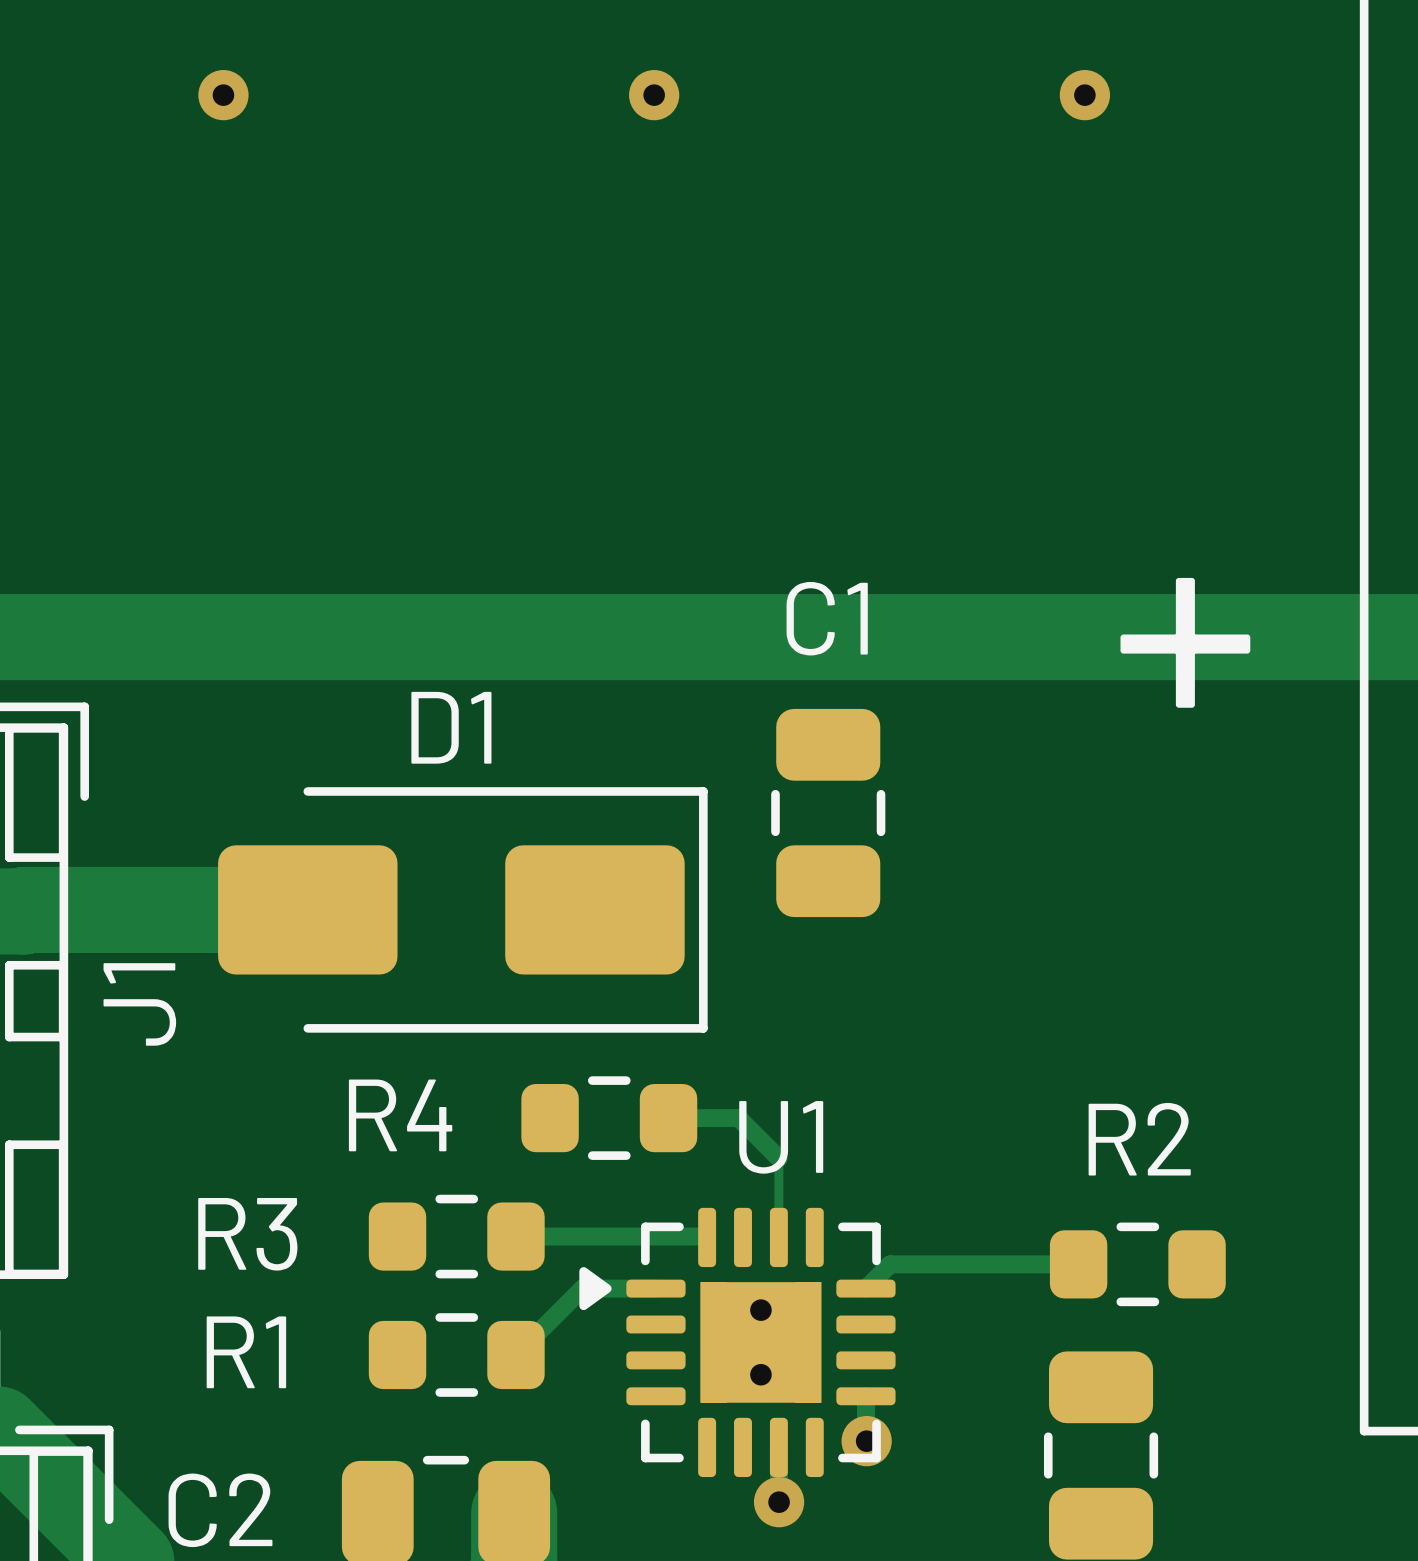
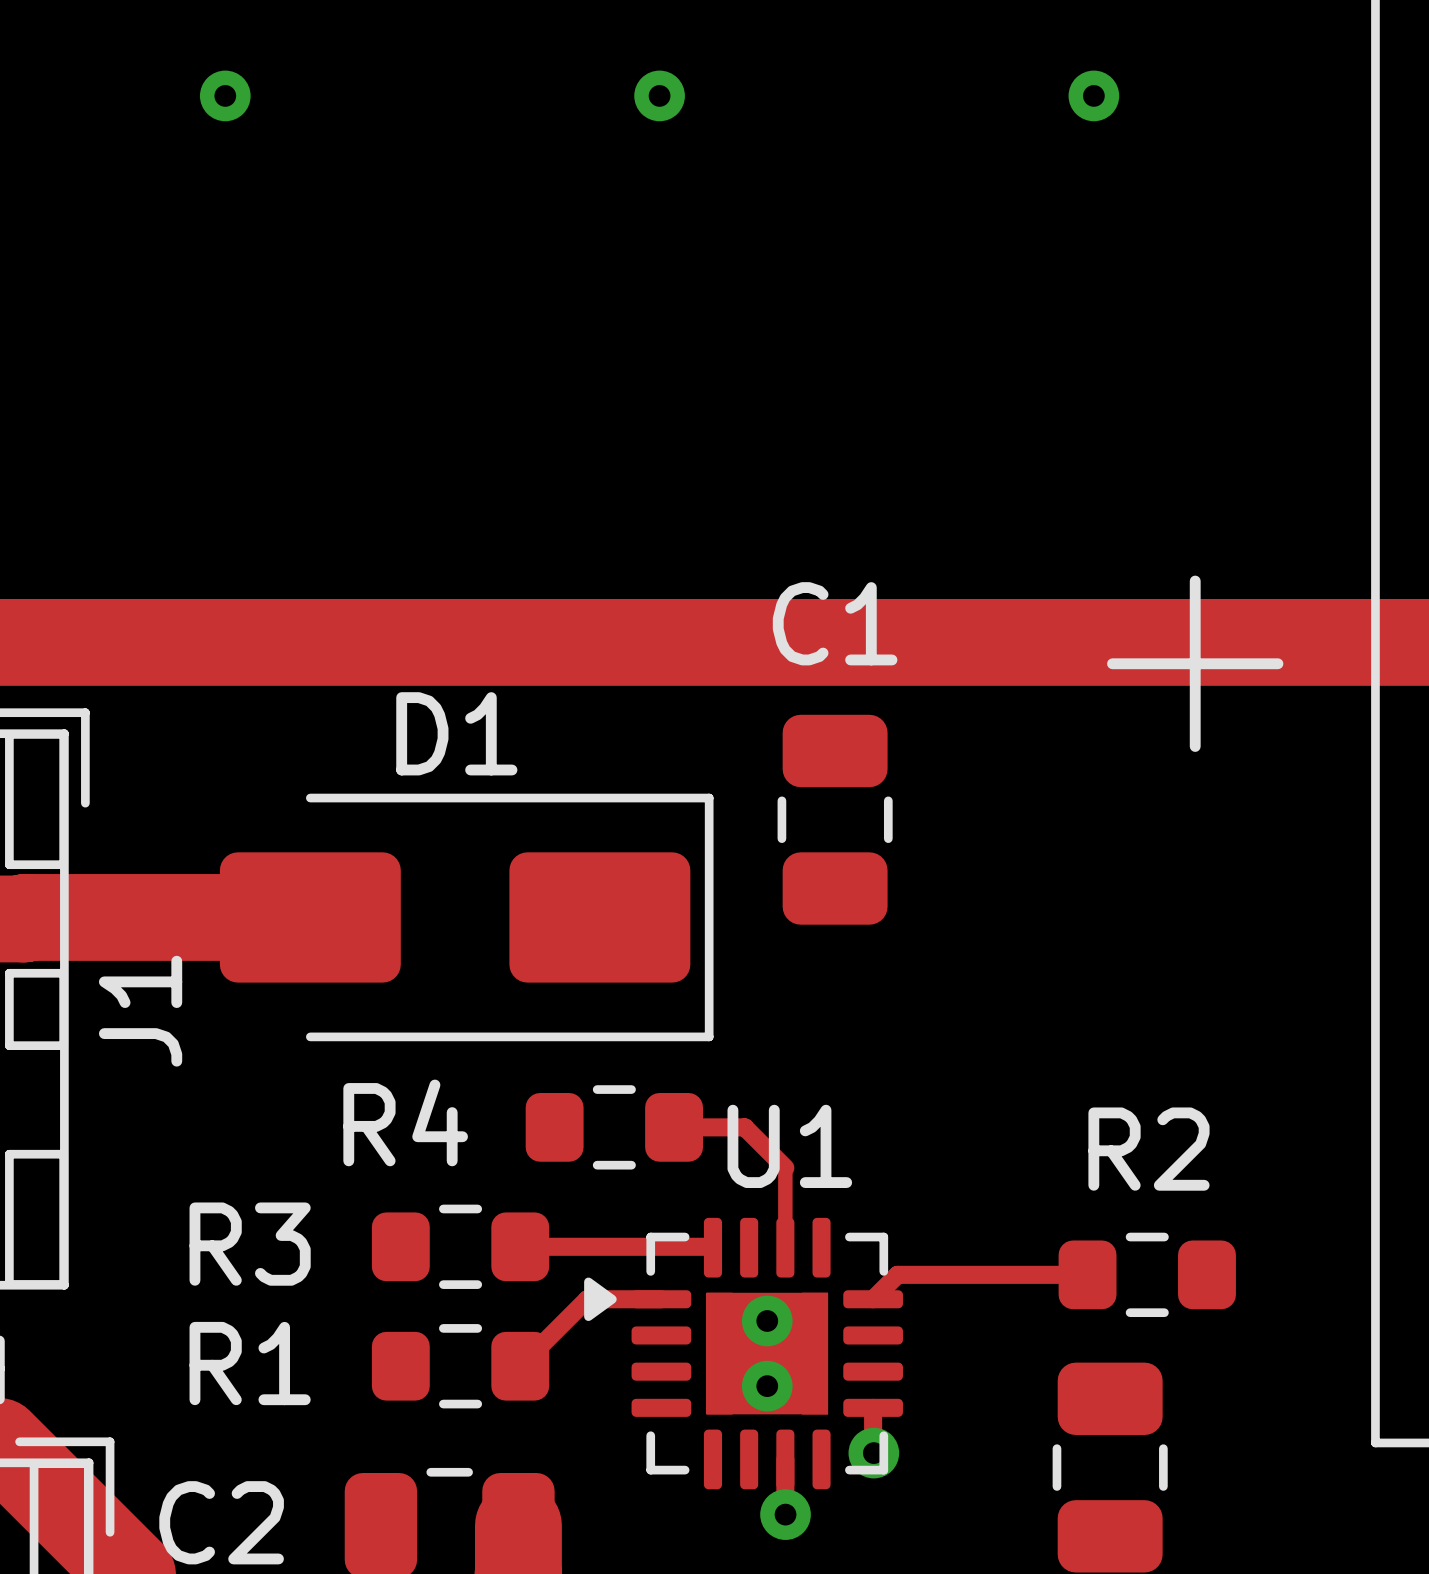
track width: thin (778, 1158) (778, 1237) -> thick (785, 1167) (785, 1247)

